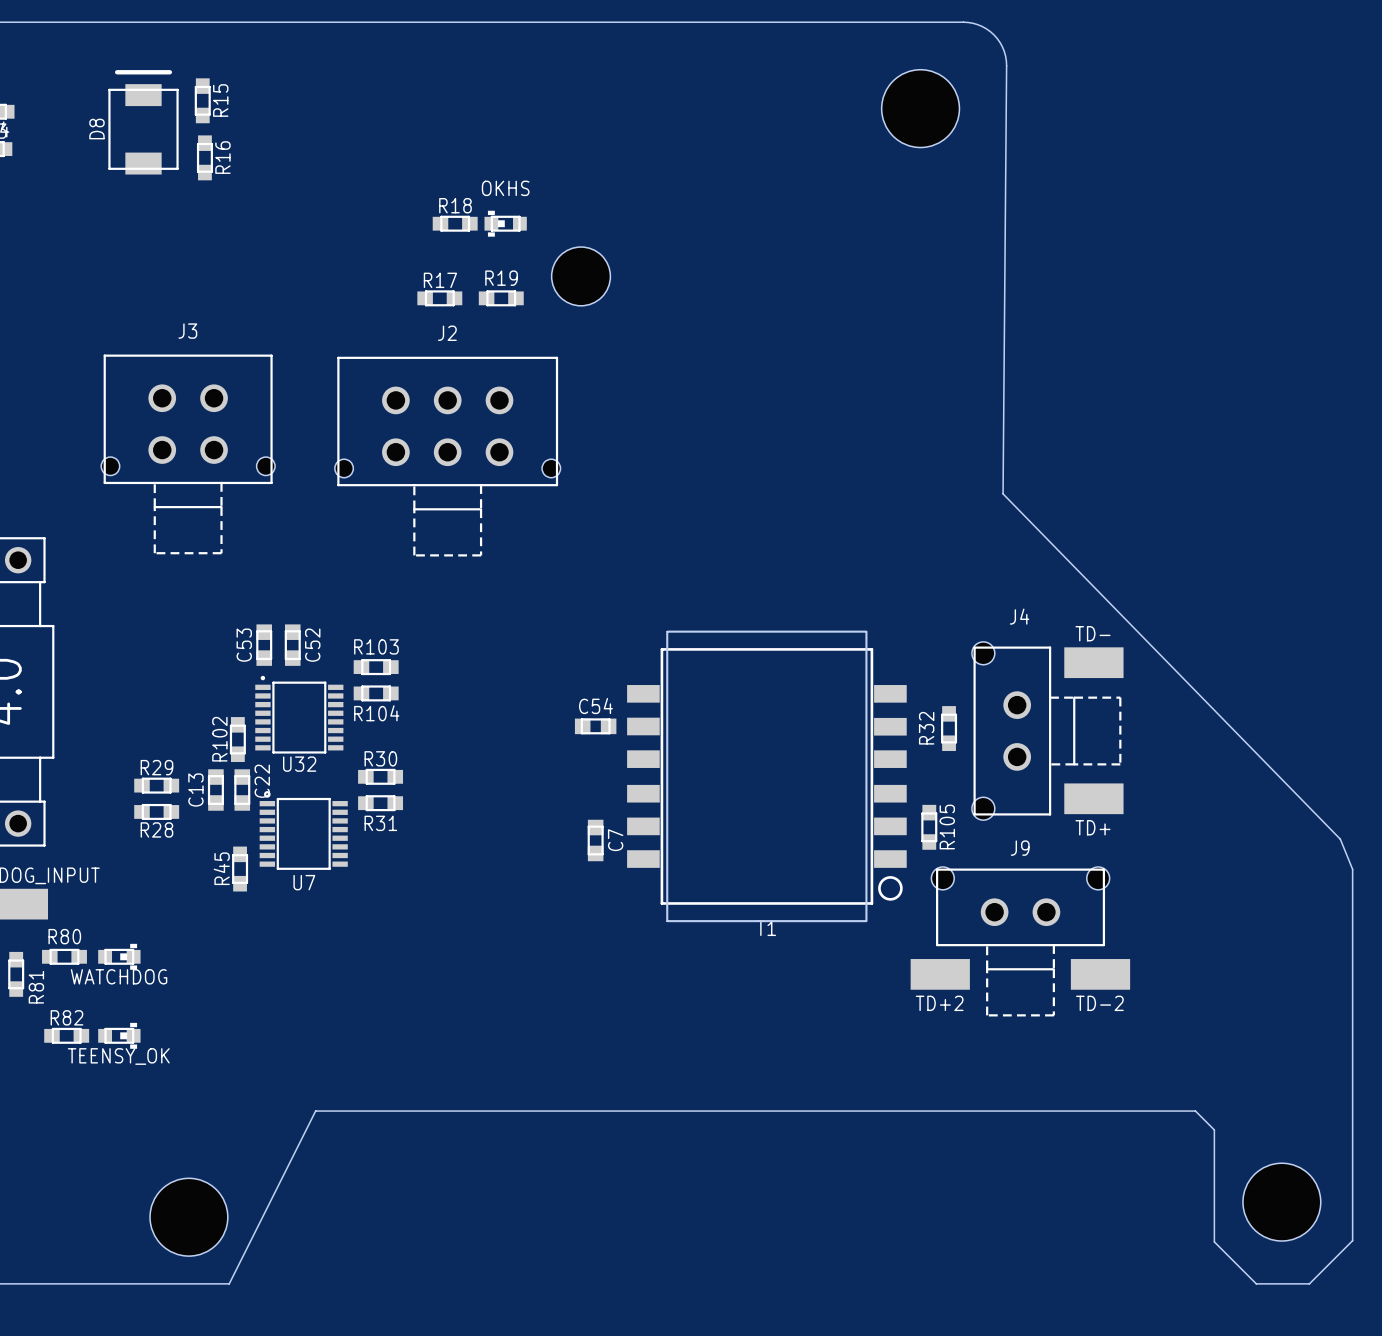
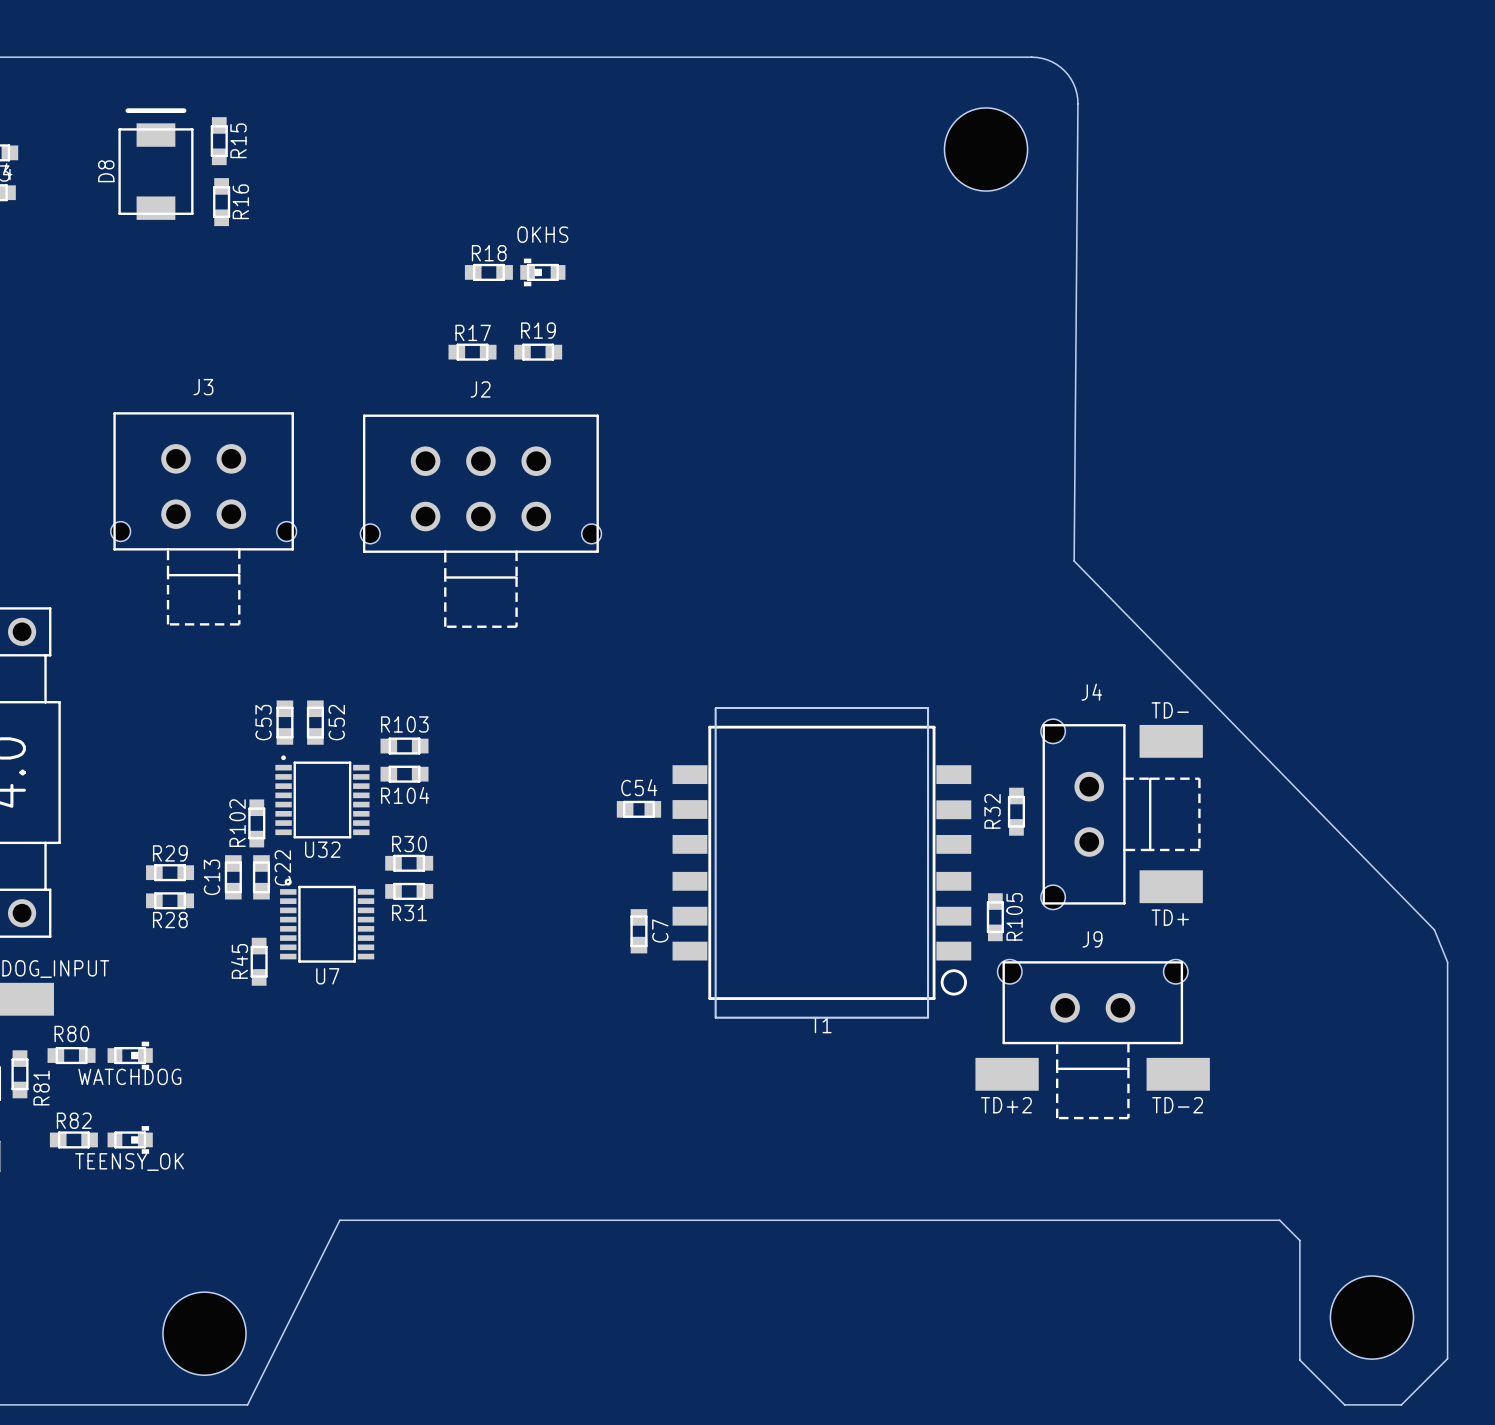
part: (581, 276) -> none

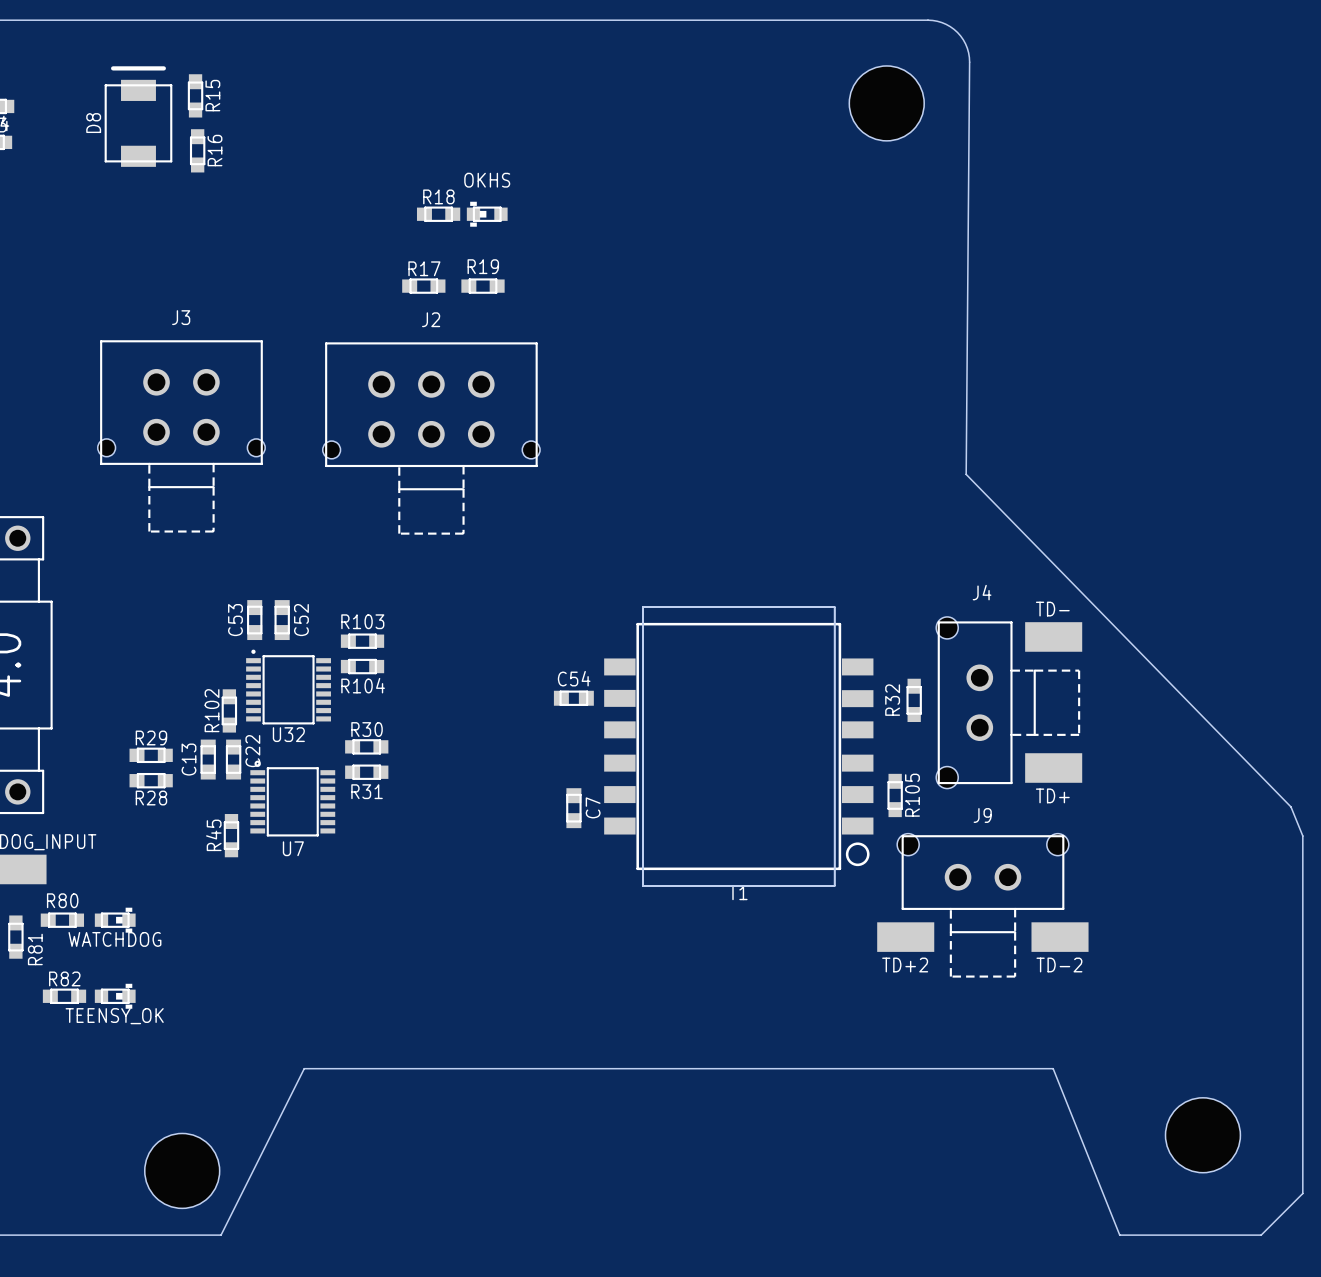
board edge: (1170, 1220) (1279, 1220) (1299, 1240) (1299, 1360) (1344, 1404) -> (1053, 1068) (1119, 1235) (1210, 1235)
part position: (1371, 1317) -> (1202, 1135)

